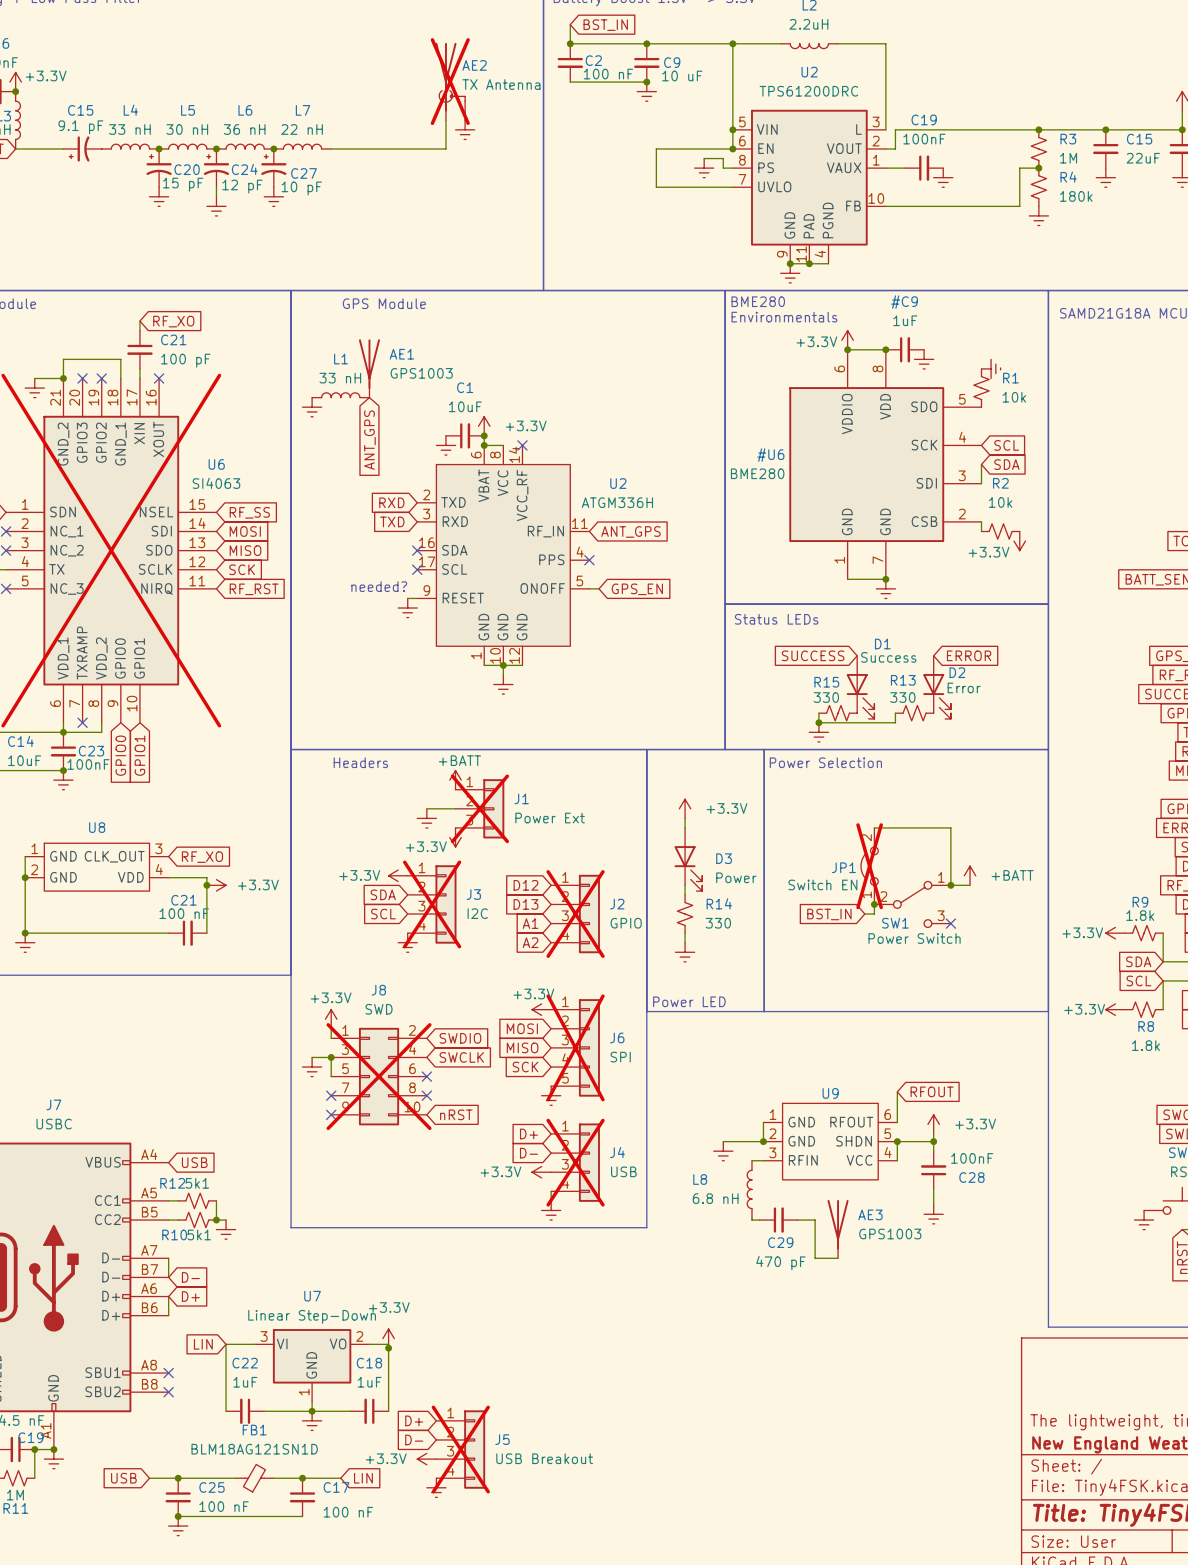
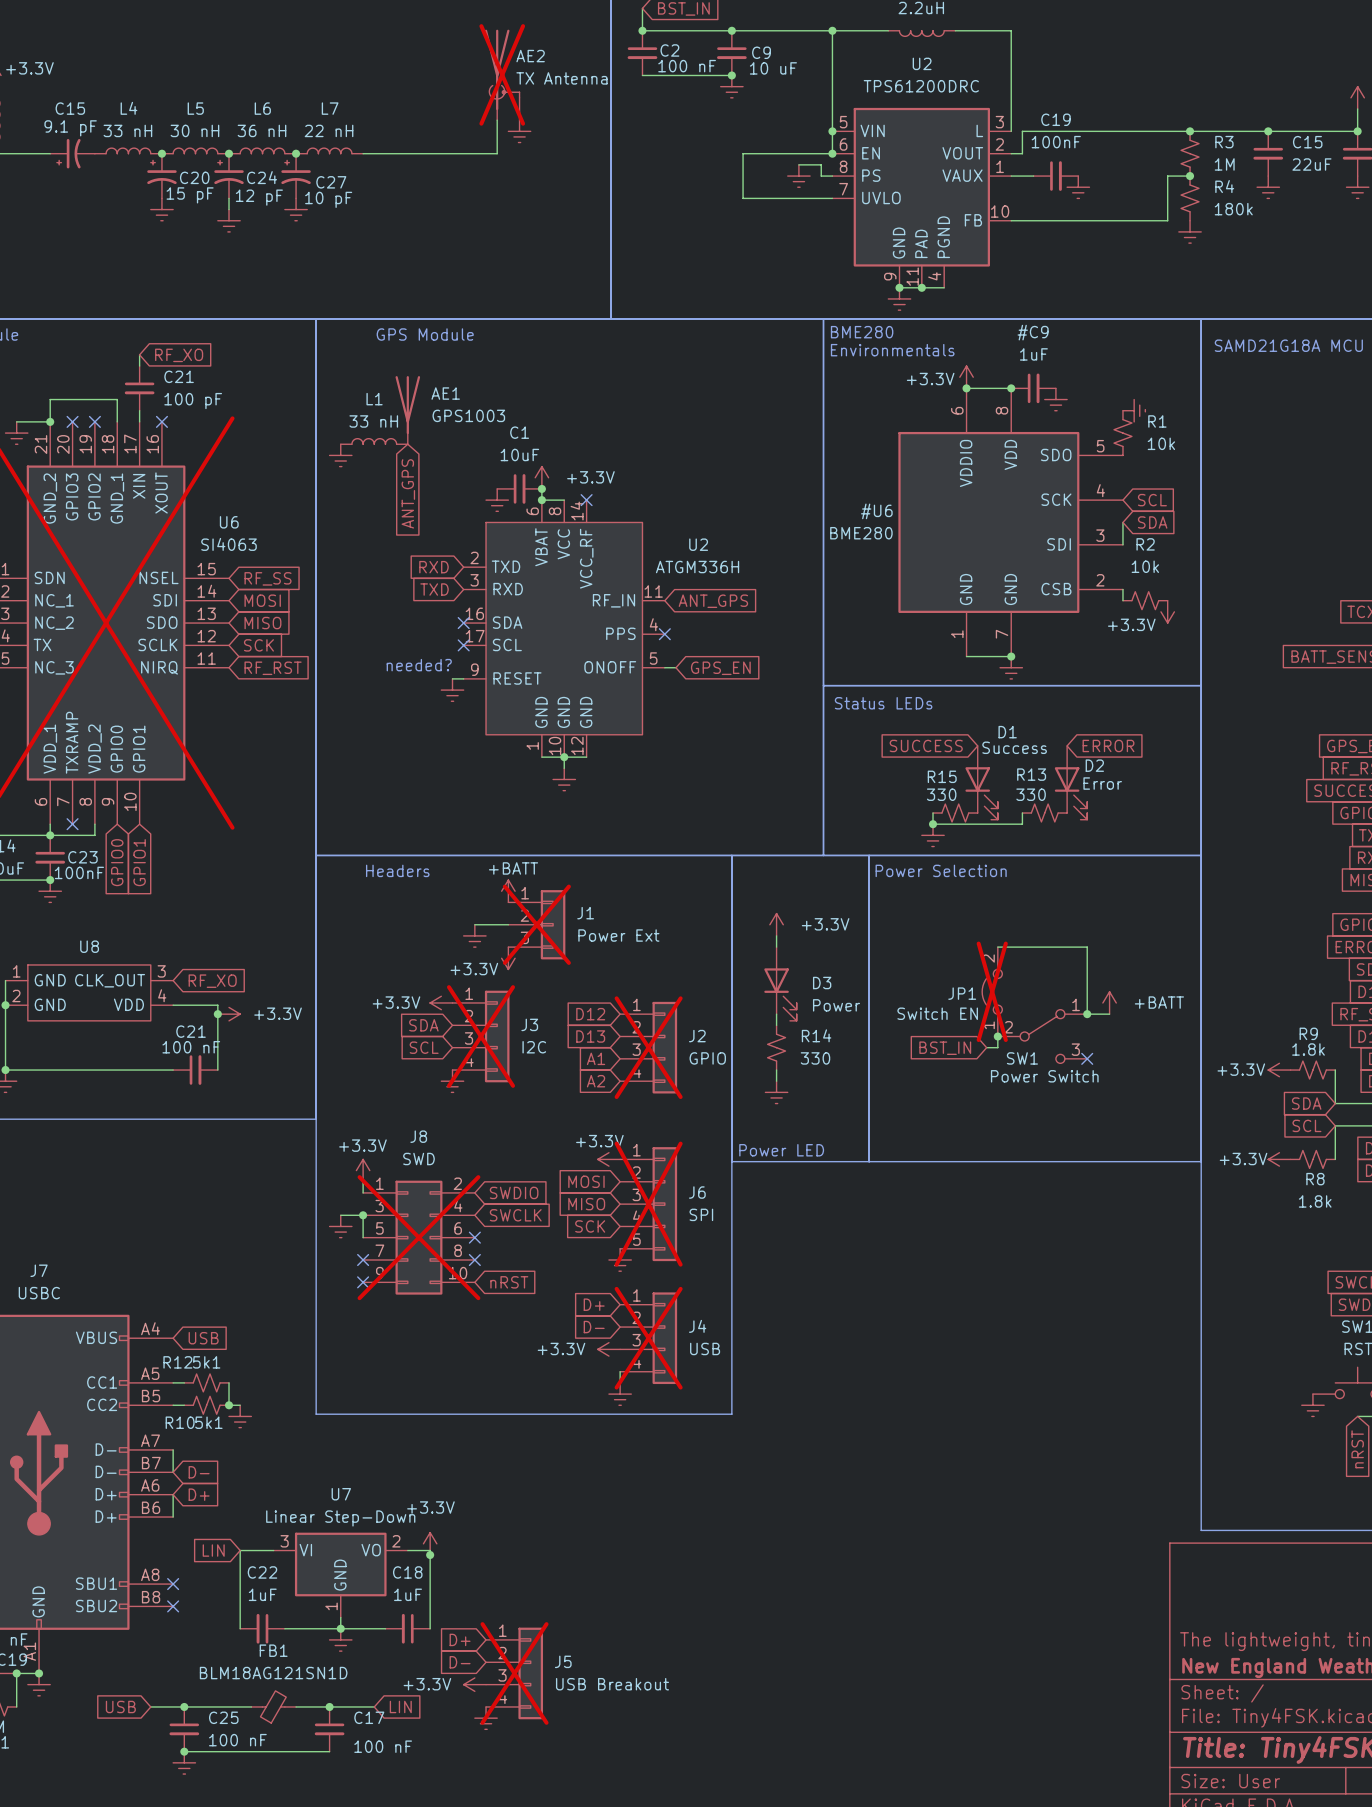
wire: (897, 1091) (897, 1122) -> none
global label: RFOUT (932, 1091) -> none
wire: (763, 1122) (763, 1141) (723, 1141) -> none
power symbol: +3.3V (933, 1124) -> none
wire: (933, 1133) (933, 1151) -> none
junction: (763, 1141) -> none
U9: (830, 1141) -> none
junction: (897, 1141) -> none
wire: (933, 1141) (897, 1141) (897, 1160) -> none
junction: (933, 1141) -> none
power symbol: (723, 1151) -> none
wire: (751, 1160) (763, 1160) -> none
C28: 100nF (933, 1170) -> none
L8: 6.8 nH (749, 1189) -> none
wire: (933, 1189) (933, 1204) -> none
power symbol: (933, 1214) -> none
wire: (751, 1218) (751, 1220) (759, 1220) -> none
C29: 470 pF (778, 1220) -> none
wire: (797, 1220) (815, 1220) (815, 1258) (838, 1258) -> none
AE3: GPS1003 (838, 1229) -> none

